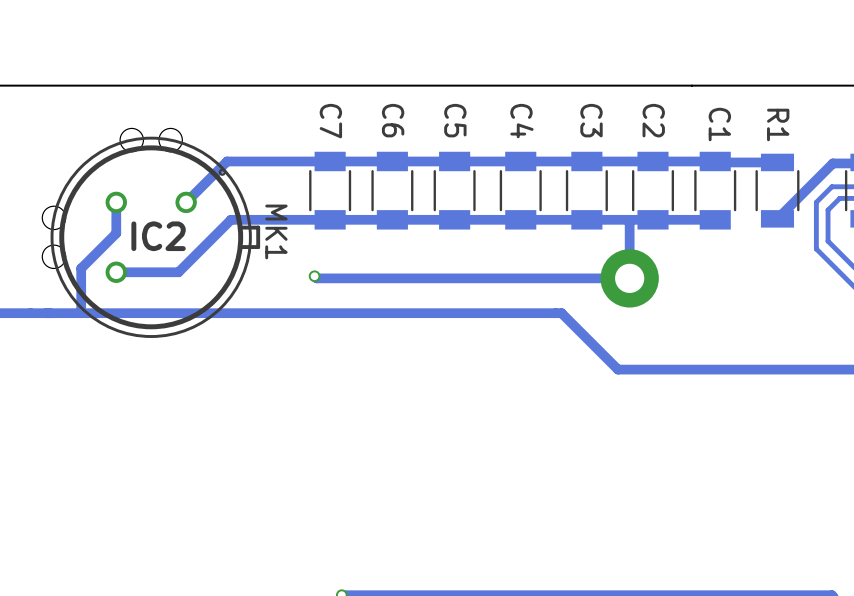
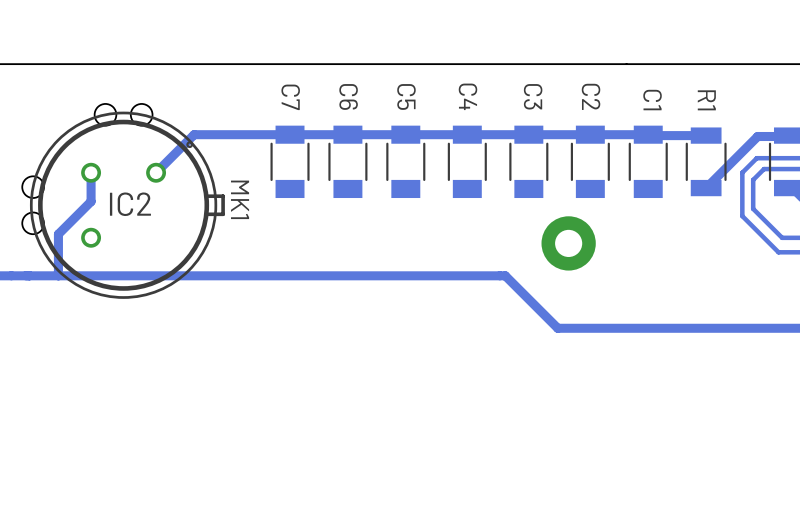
track: (629, 219) (629, 278) (316, 278) (314, 276) -> none
track: (715, 219) (230, 219) (178, 272) (116, 272) -> none
via: (314, 276) -> none

